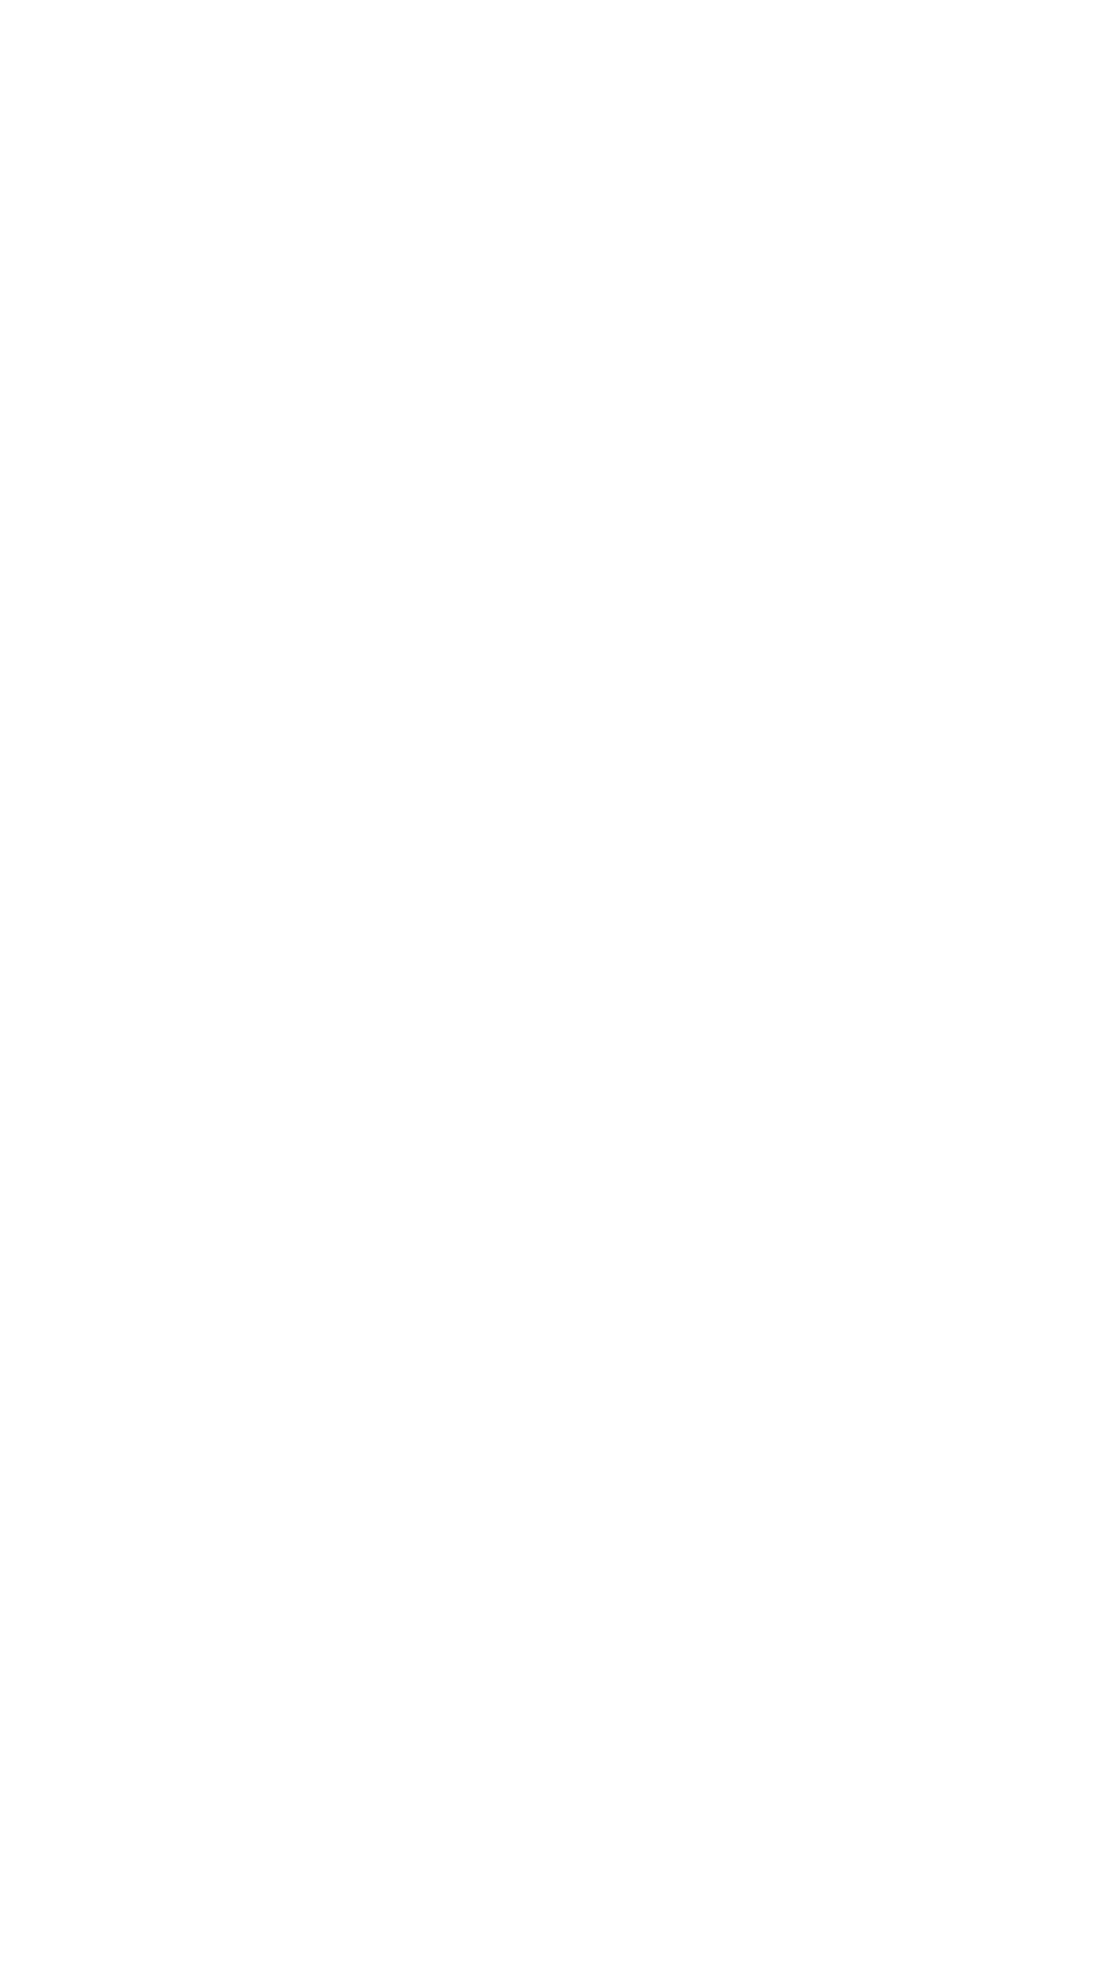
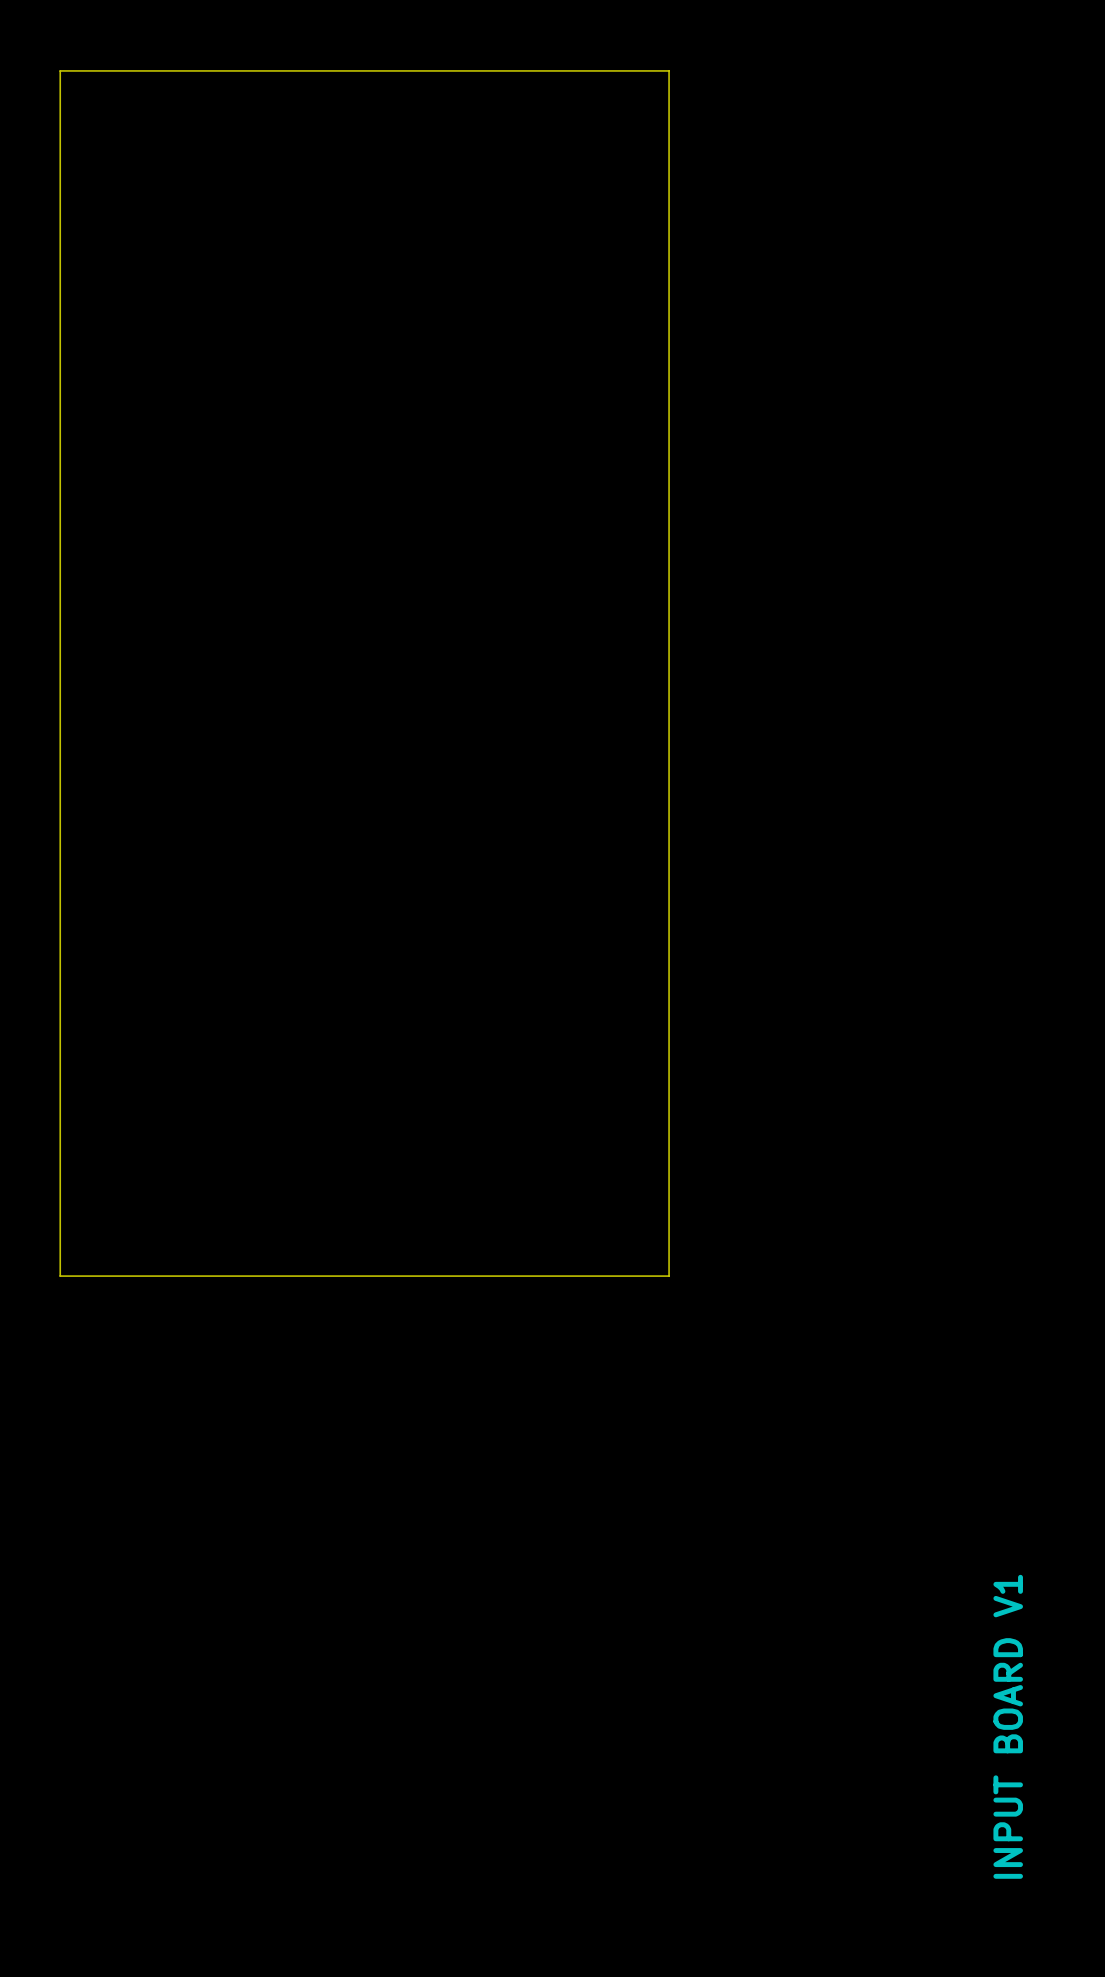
board edge: none -> (60, 70) (60, 1276) (669, 1276) (669, 70) (60, 70)
text: none -> INPUT BOARD V1 (1008, 1726)

